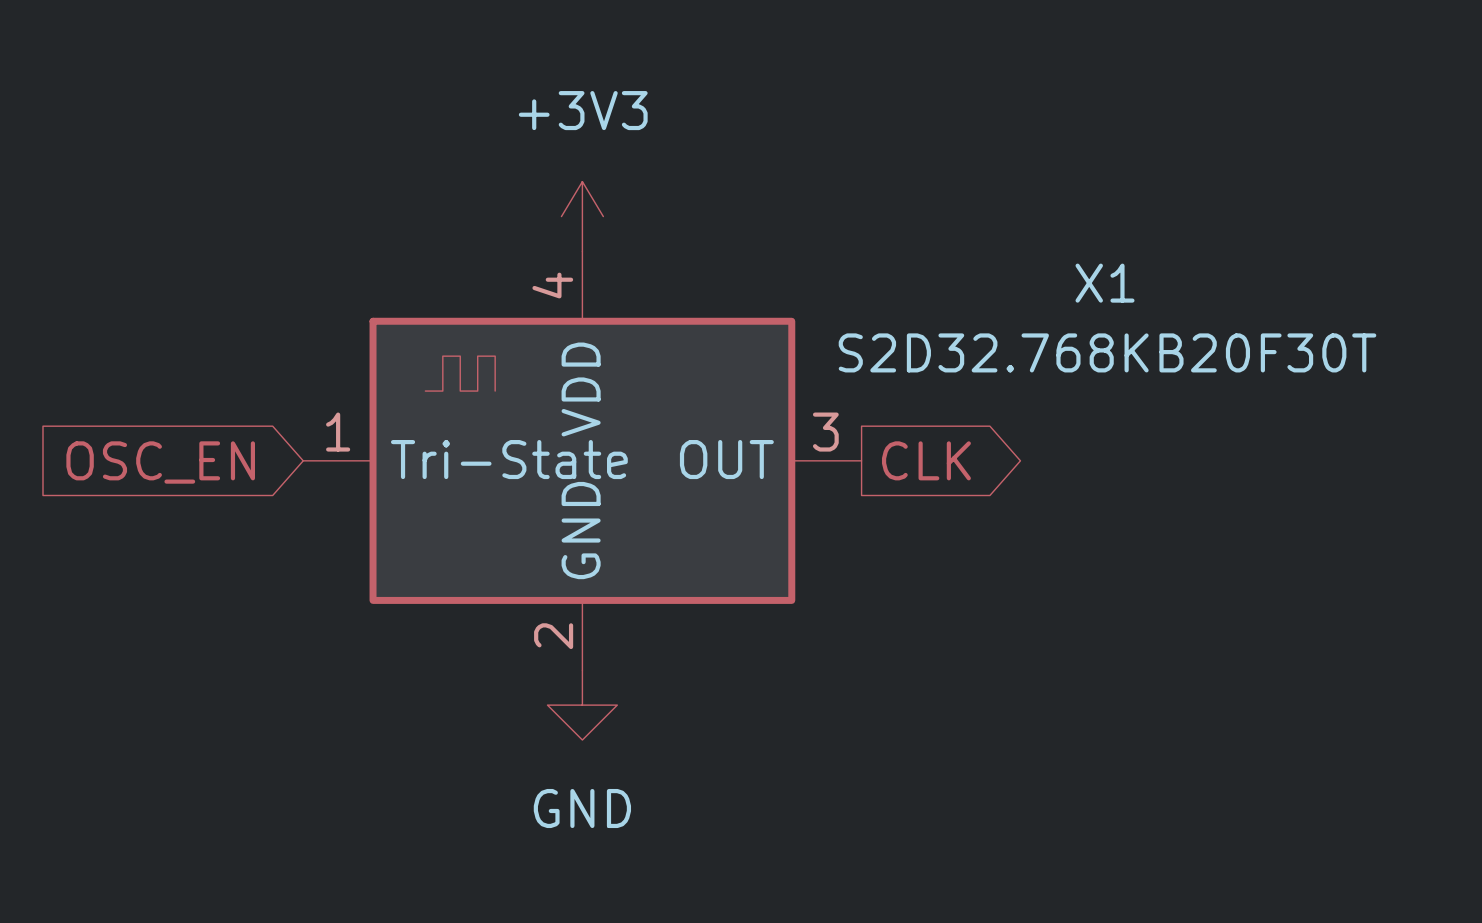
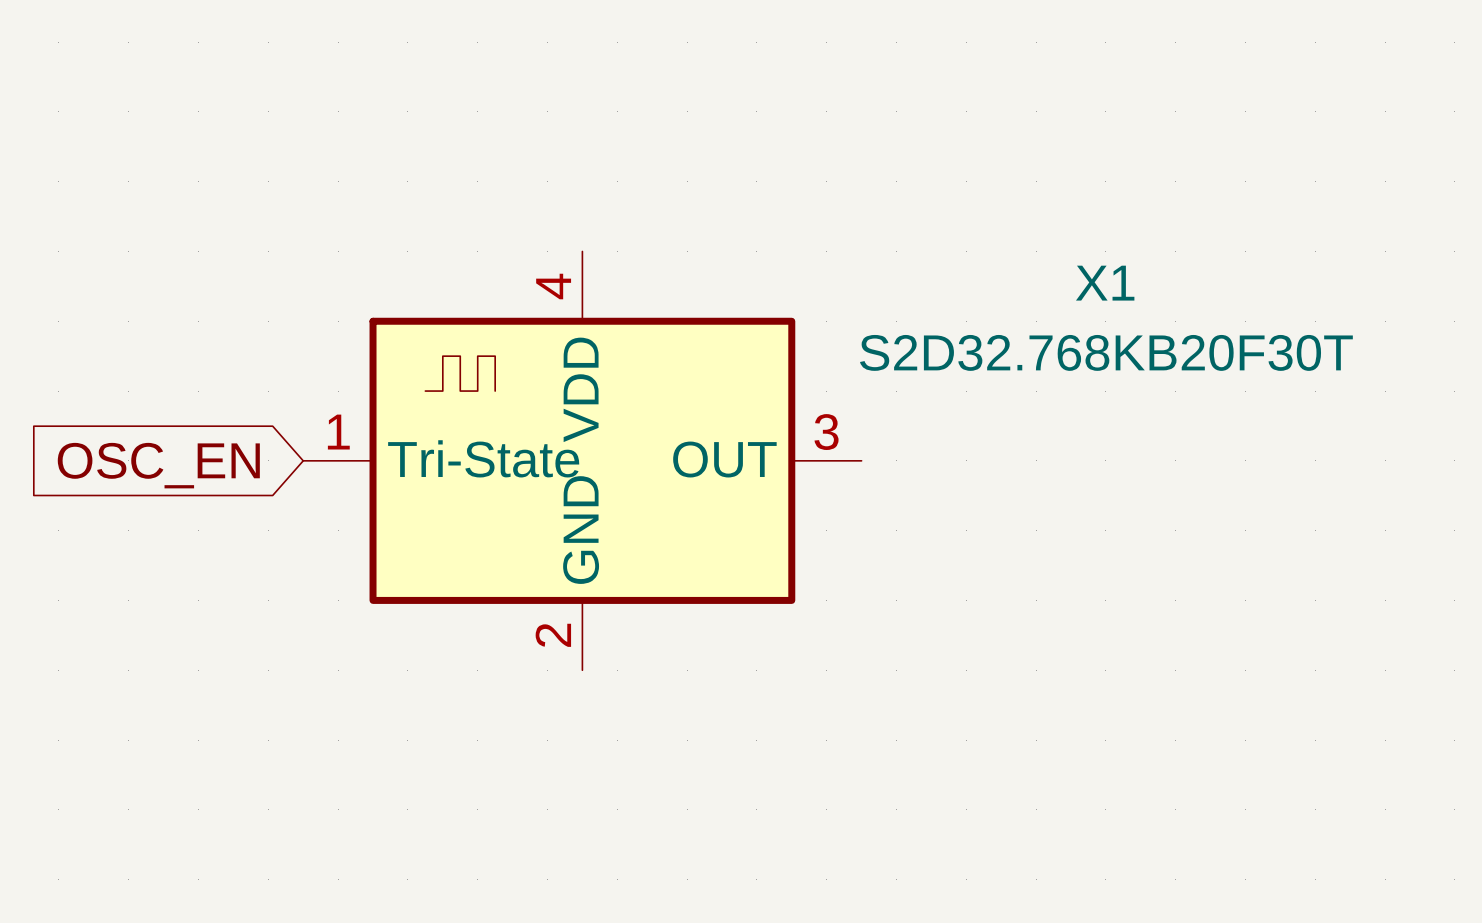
power symbol: +3V3 (582, 216) -> none
global label: CLK (926, 460) -> none
power symbol: GND (582, 705) -> none

